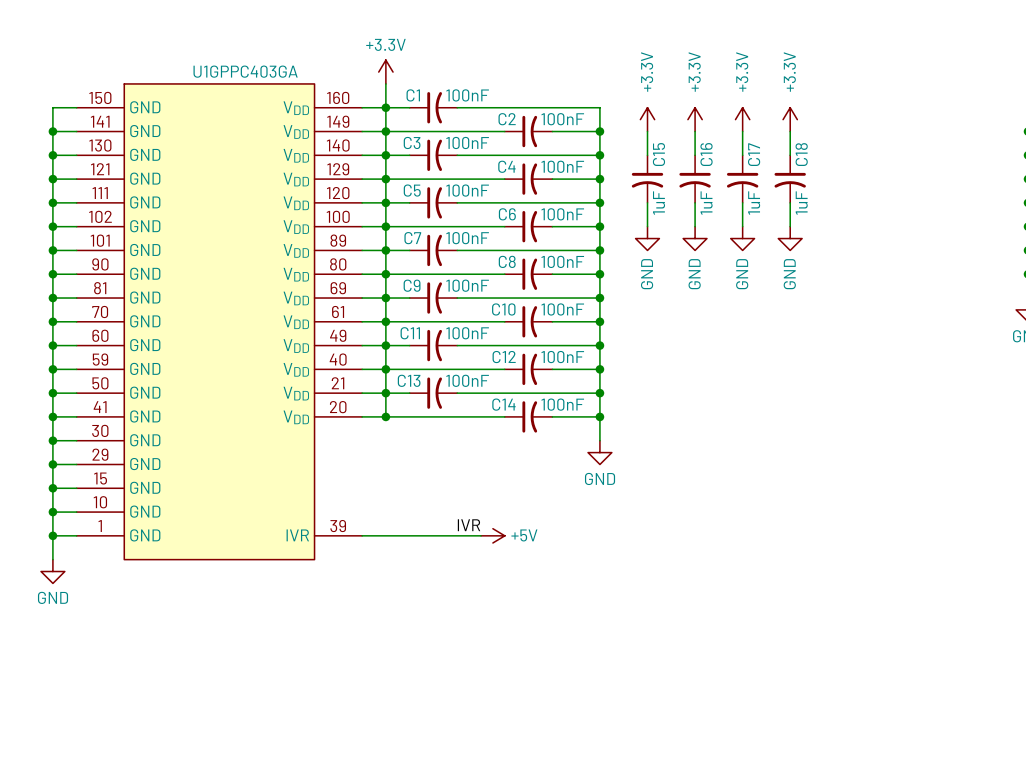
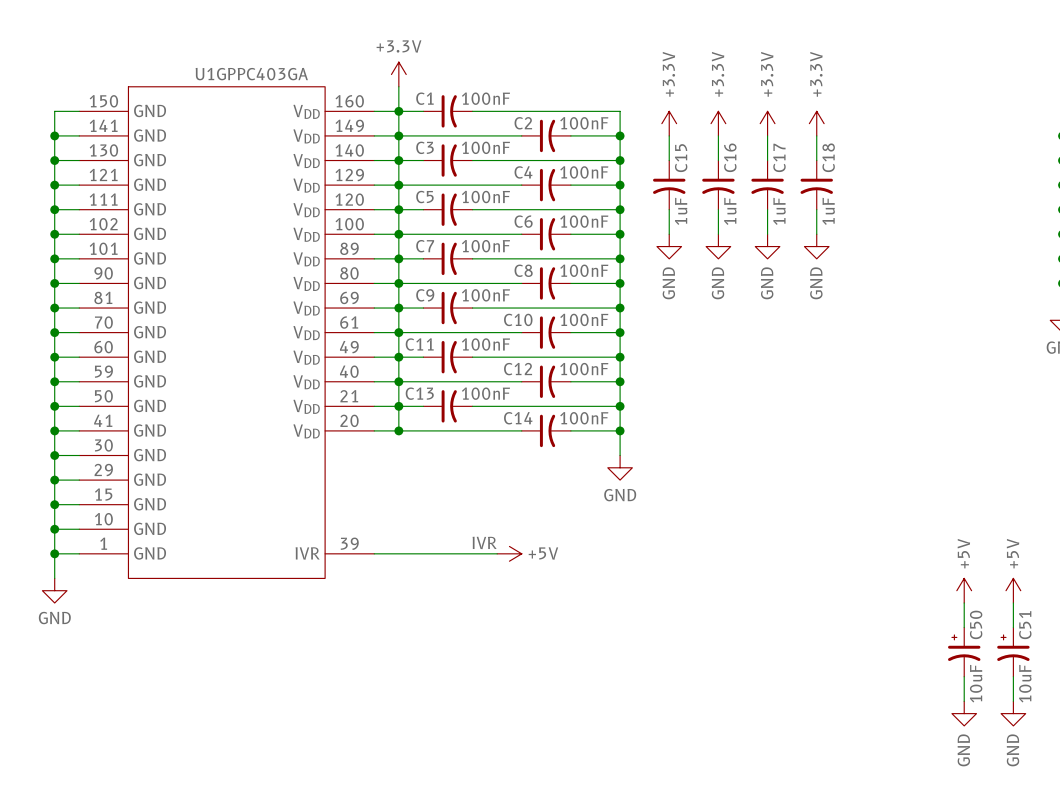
power symbol: none -> +5V (964, 590)
power symbol: none -> +5V (1013, 590)
wire: none -> (964, 603) (964, 627)
wire: none -> (1013, 603) (1013, 627)
C50: none -> 10uF (964, 652)
C51: none -> 10uF (1013, 652)
wire: none -> (964, 676) (964, 701)
wire: none -> (1013, 676) (1013, 701)
power symbol: none -> GND (964, 713)
power symbol: none -> GND (1013, 713)

